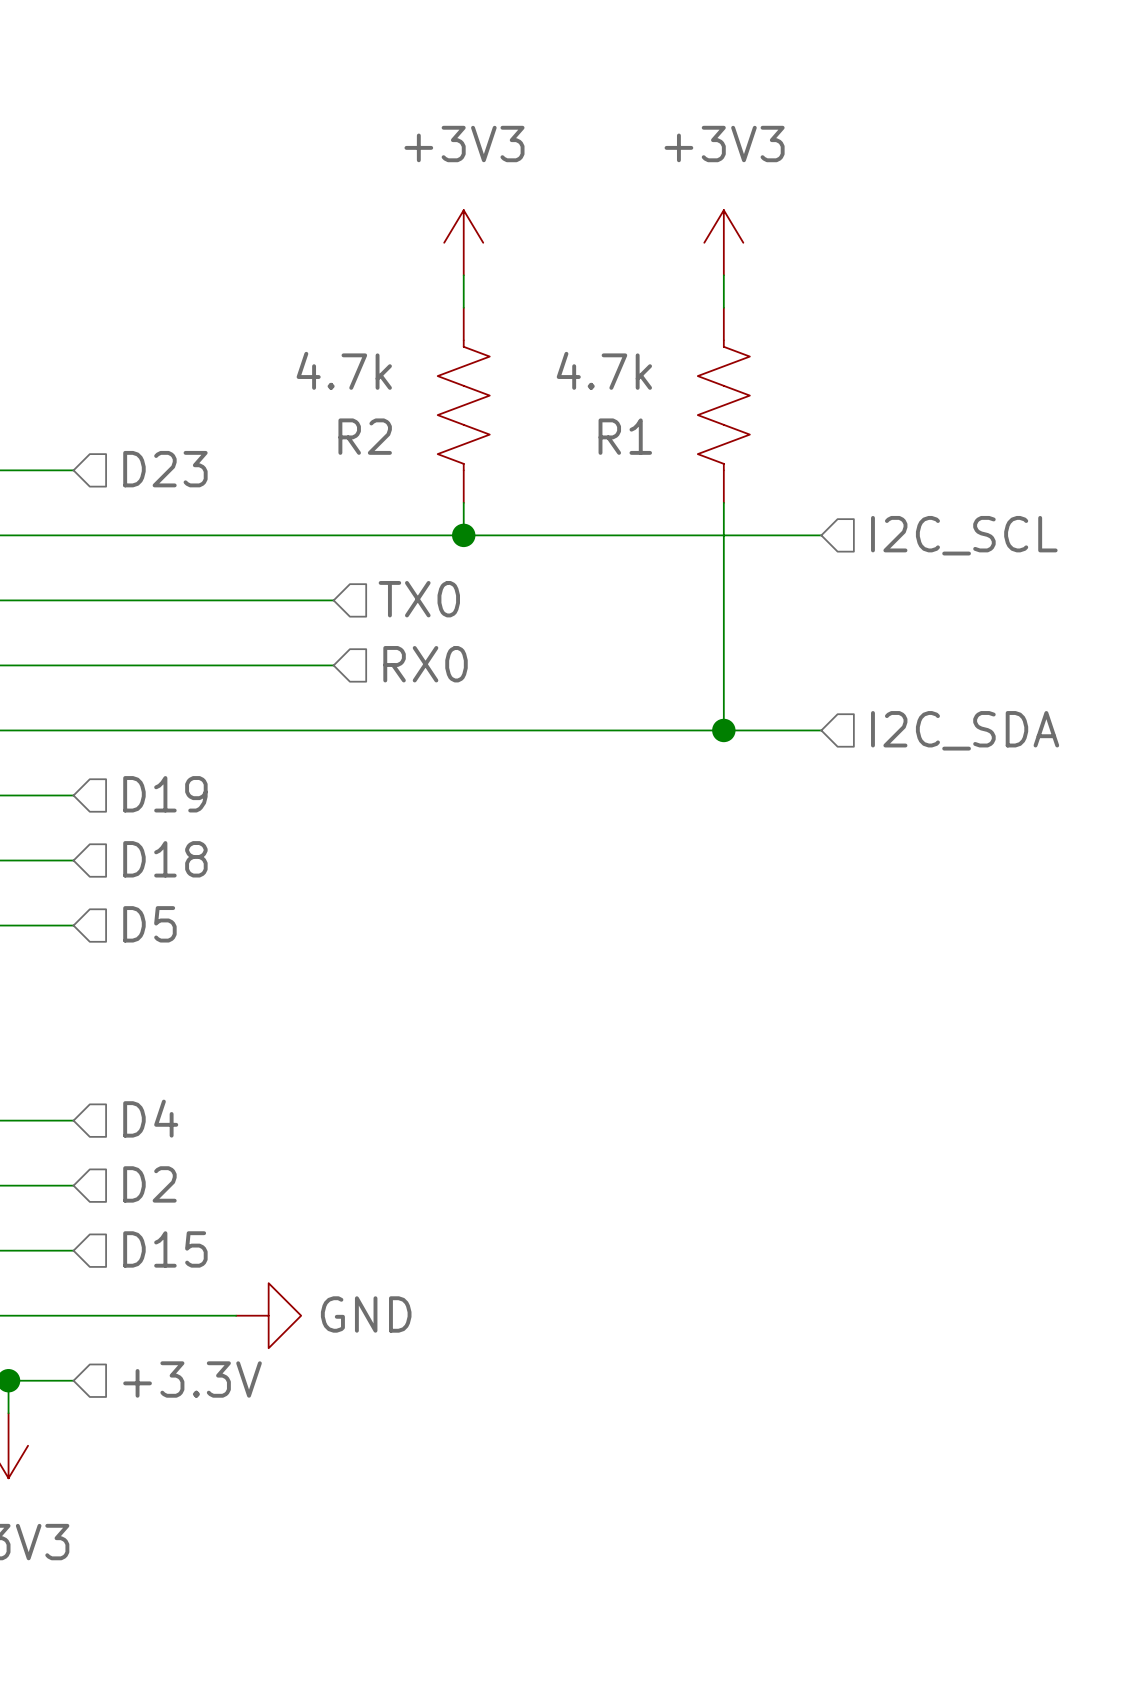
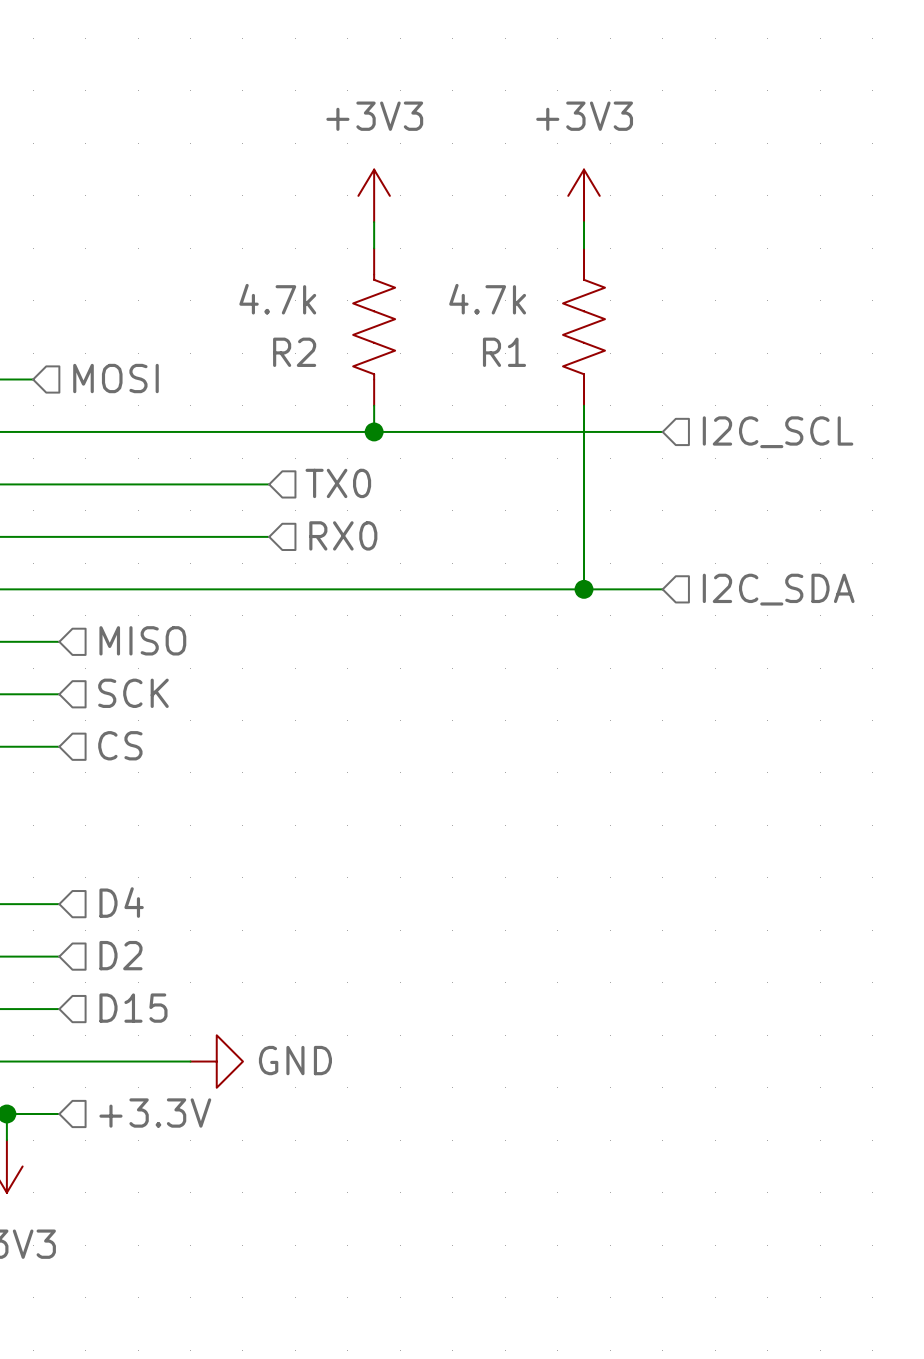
hierarchical label: none -> MOSI (115, 378)
hierarchical label: D23 (165, 469) -> none
wire: (41, 470) (73, 470) -> none
hierarchical label: D19 (165, 794) -> MISO (142, 640)
hierarchical label: D18 (165, 859) -> SCK (133, 693)
hierarchical label: D5 (149, 924) -> CS (120, 745)

